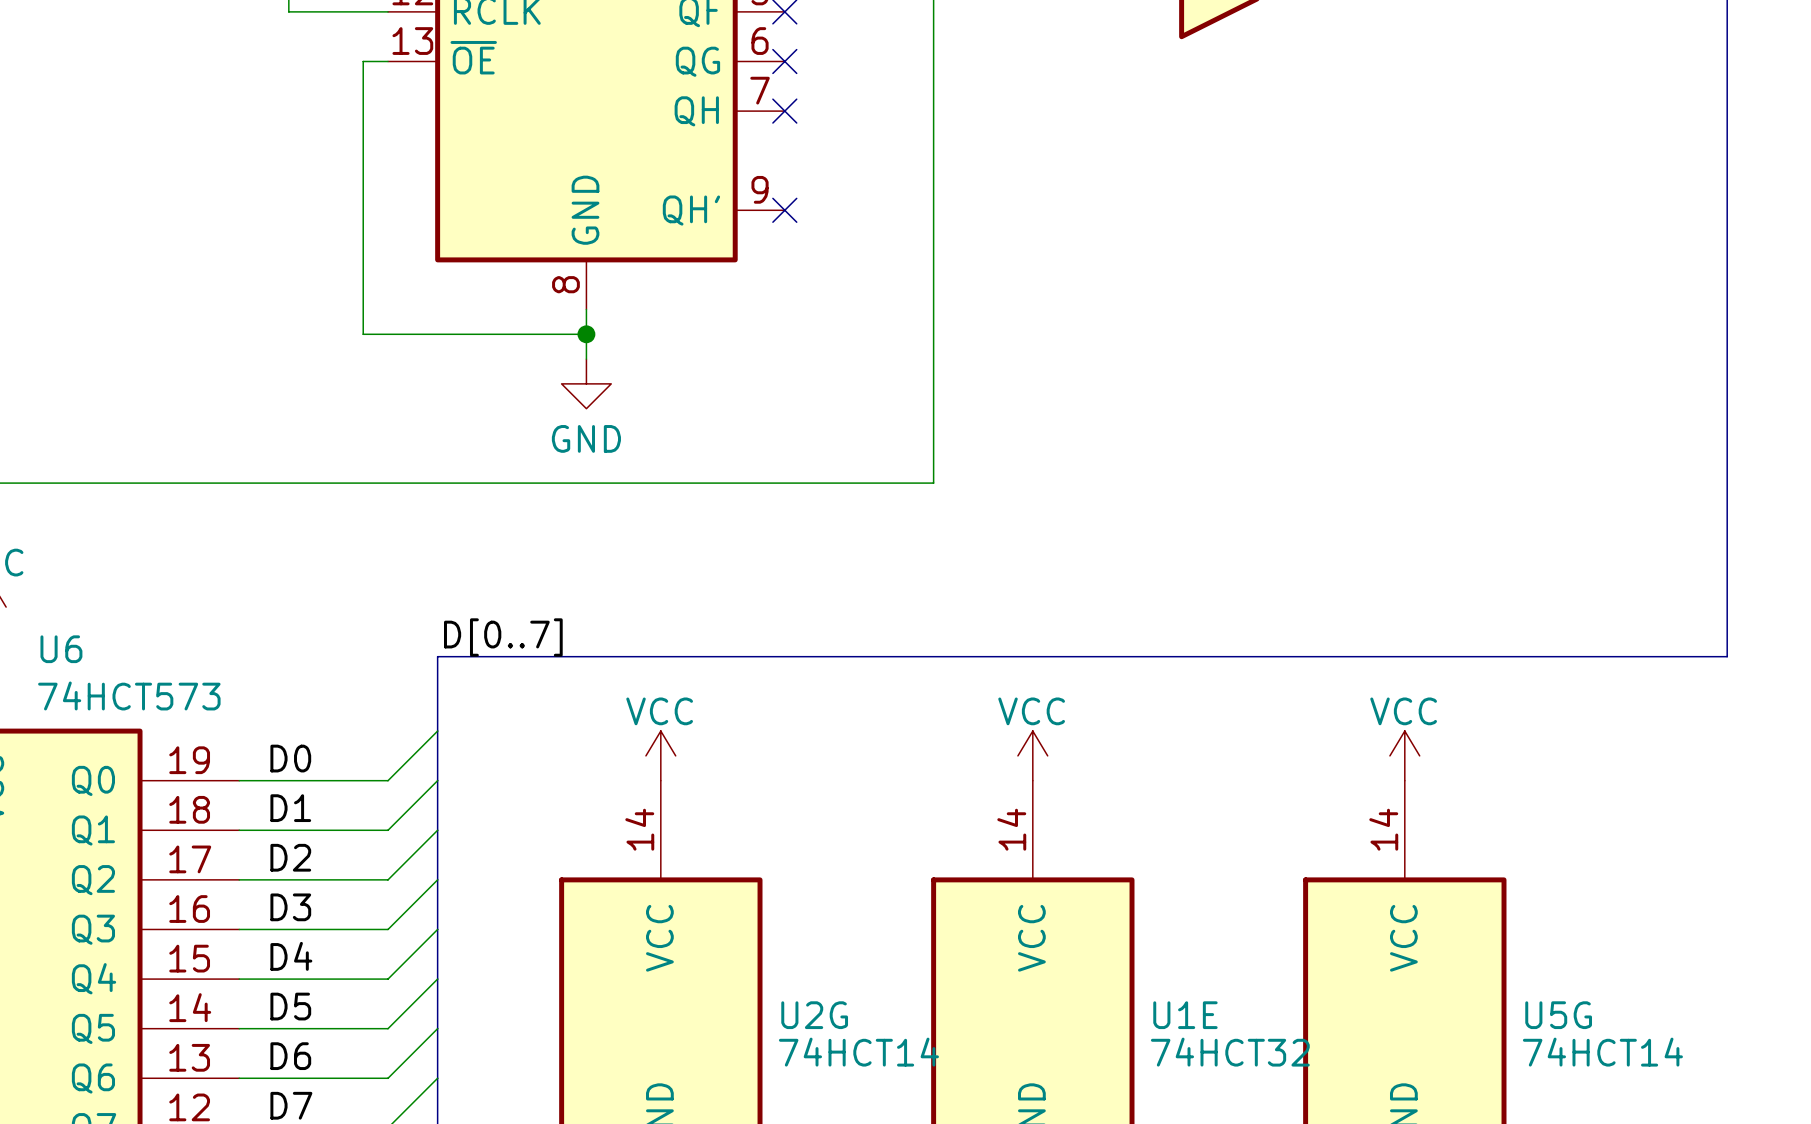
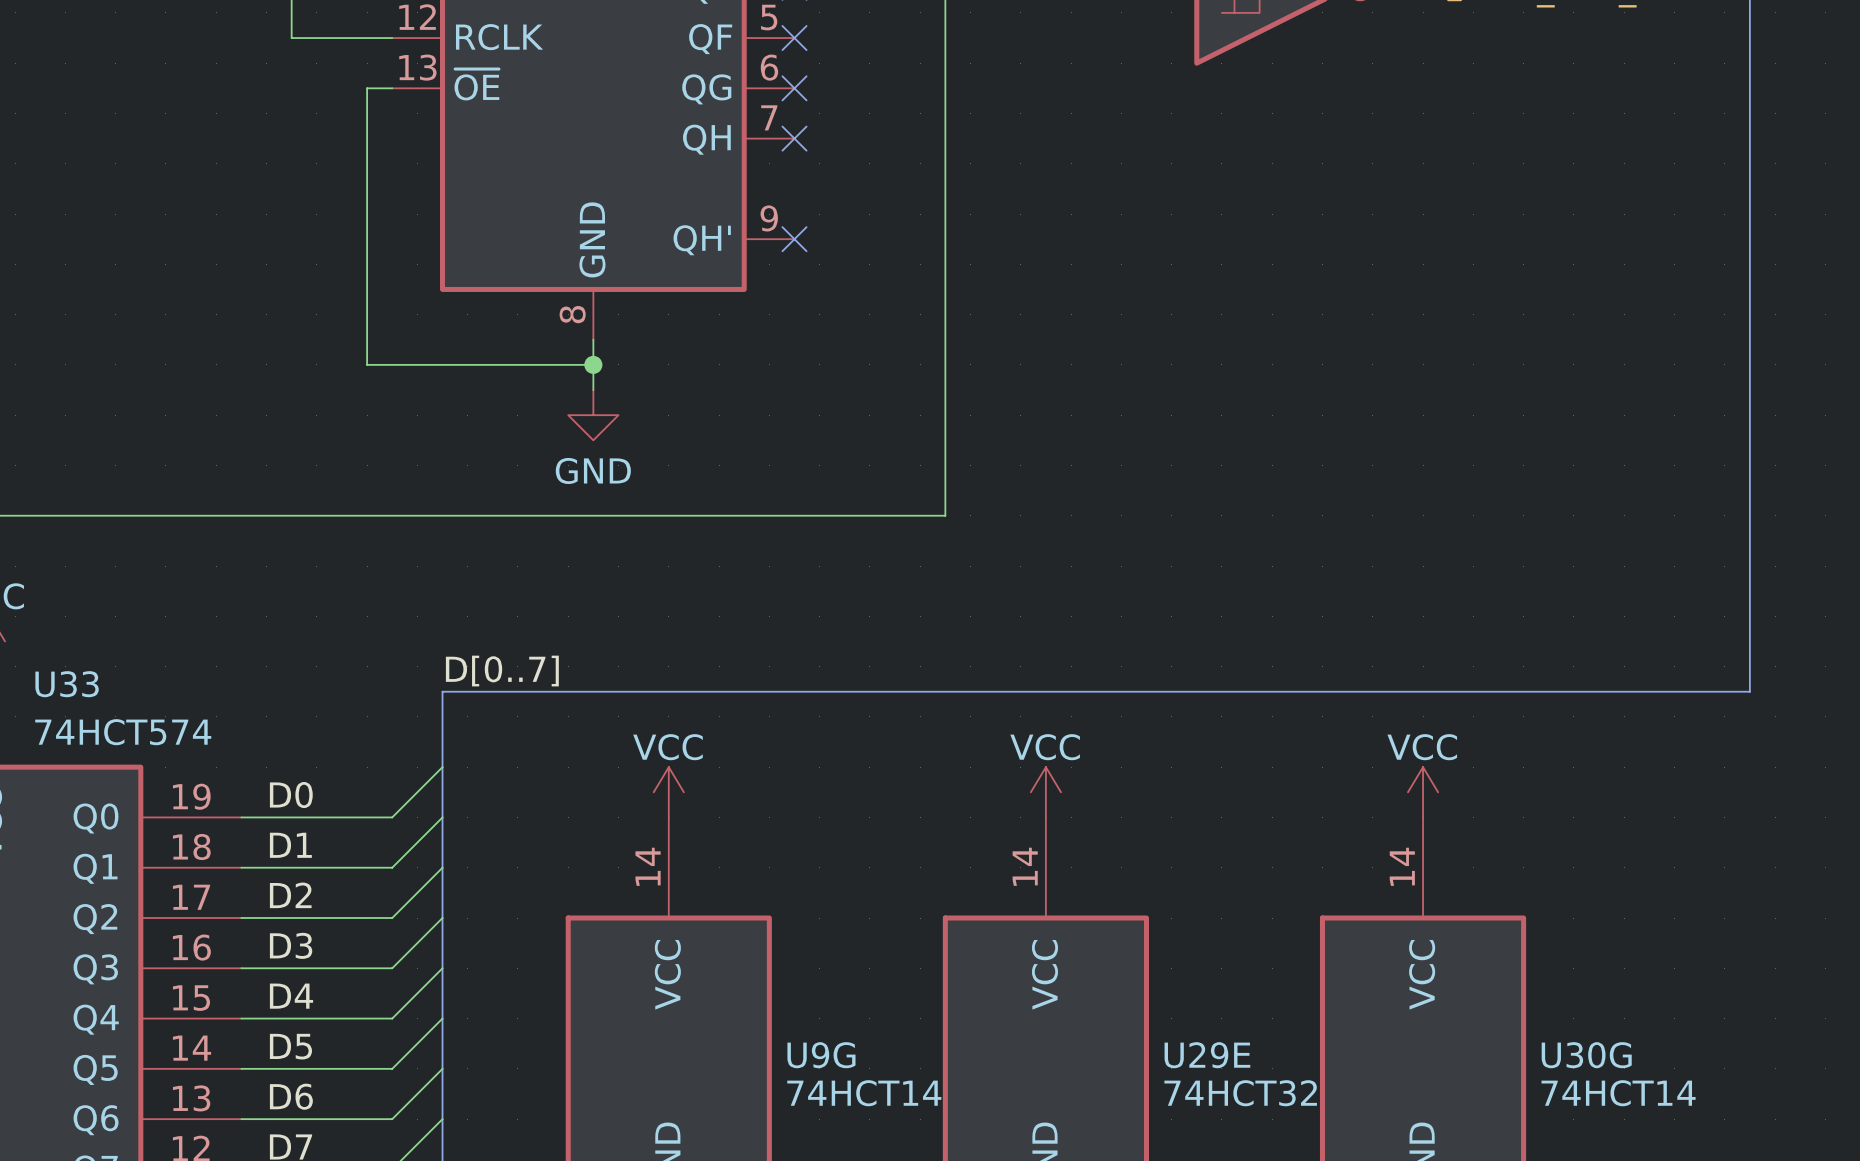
U6 name: U6 (61, 649) -> U33 (67, 684)
U6 value: 74HCT573 (129, 695) -> 74HCT574 (123, 732)
U2G name: U2G (814, 1015) -> U9G (821, 1055)
U1E name: U1E (1185, 1015) -> U29E (1207, 1055)
U5G name: U5G (1558, 1015) -> U30G (1586, 1055)

